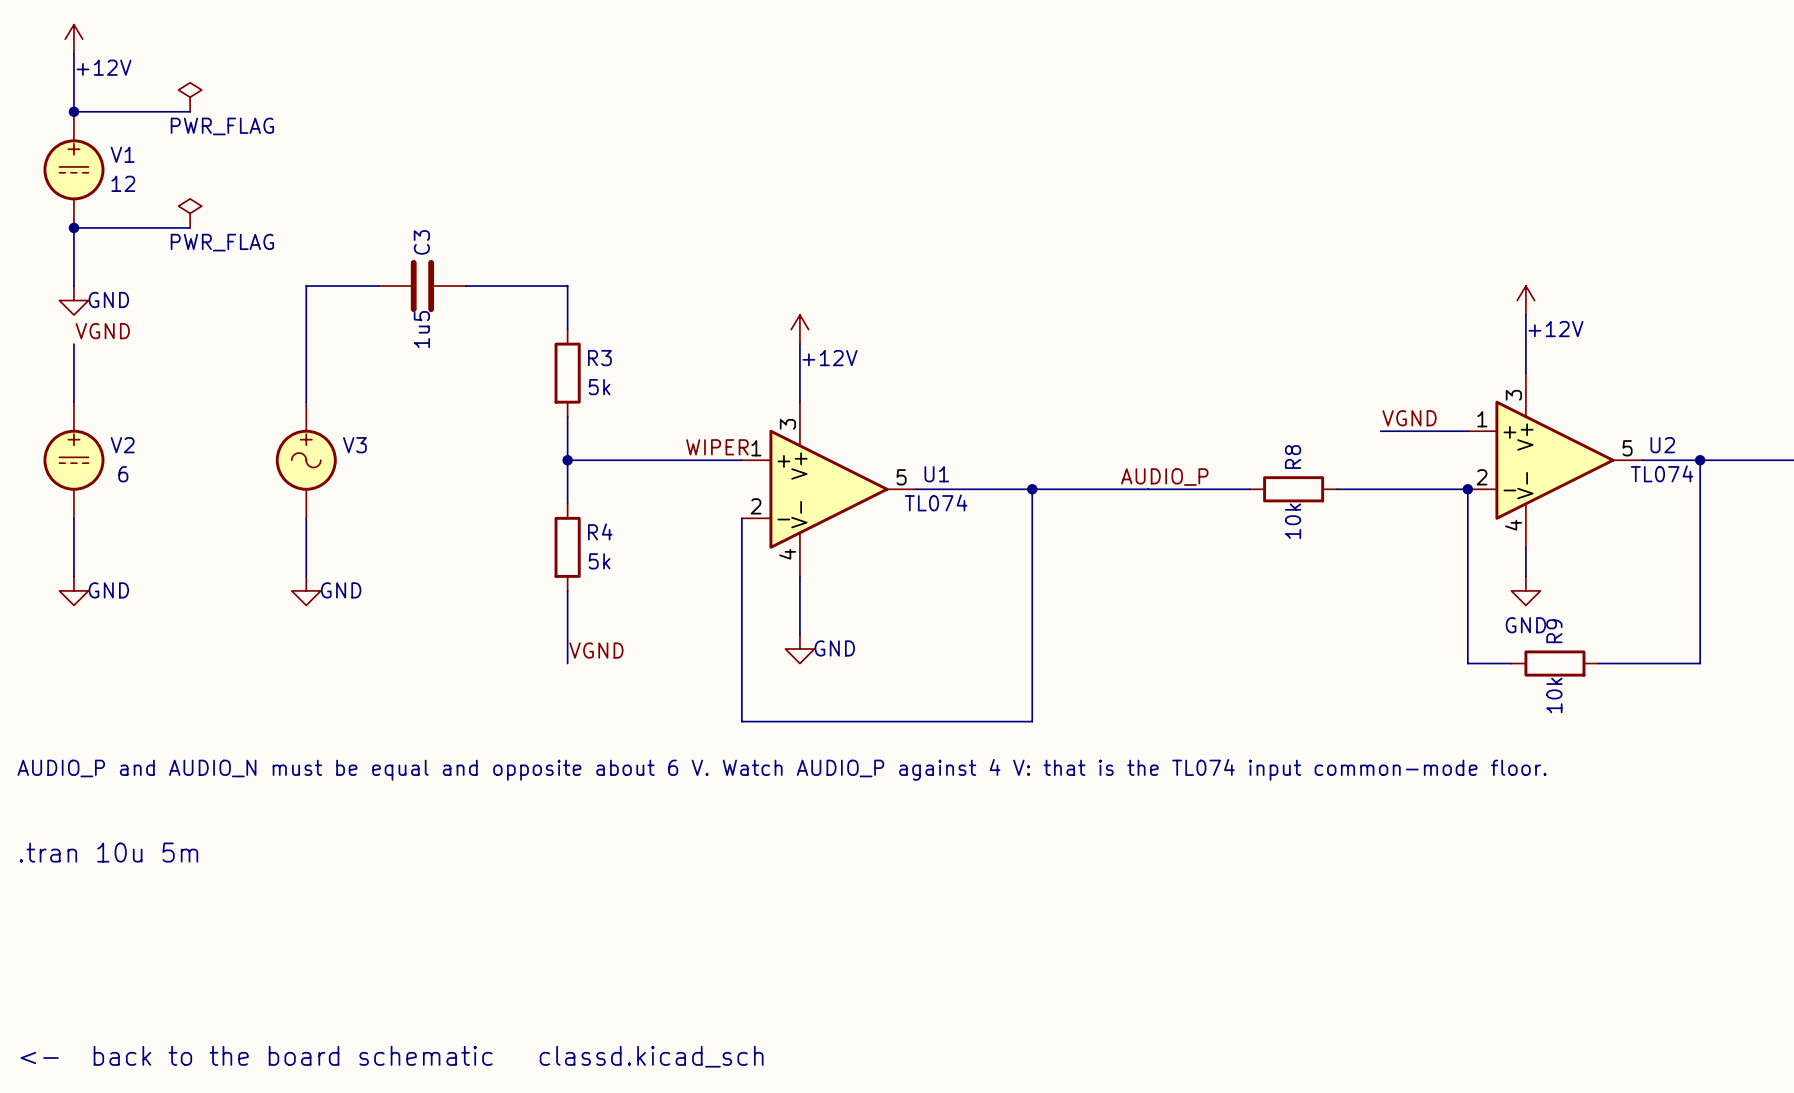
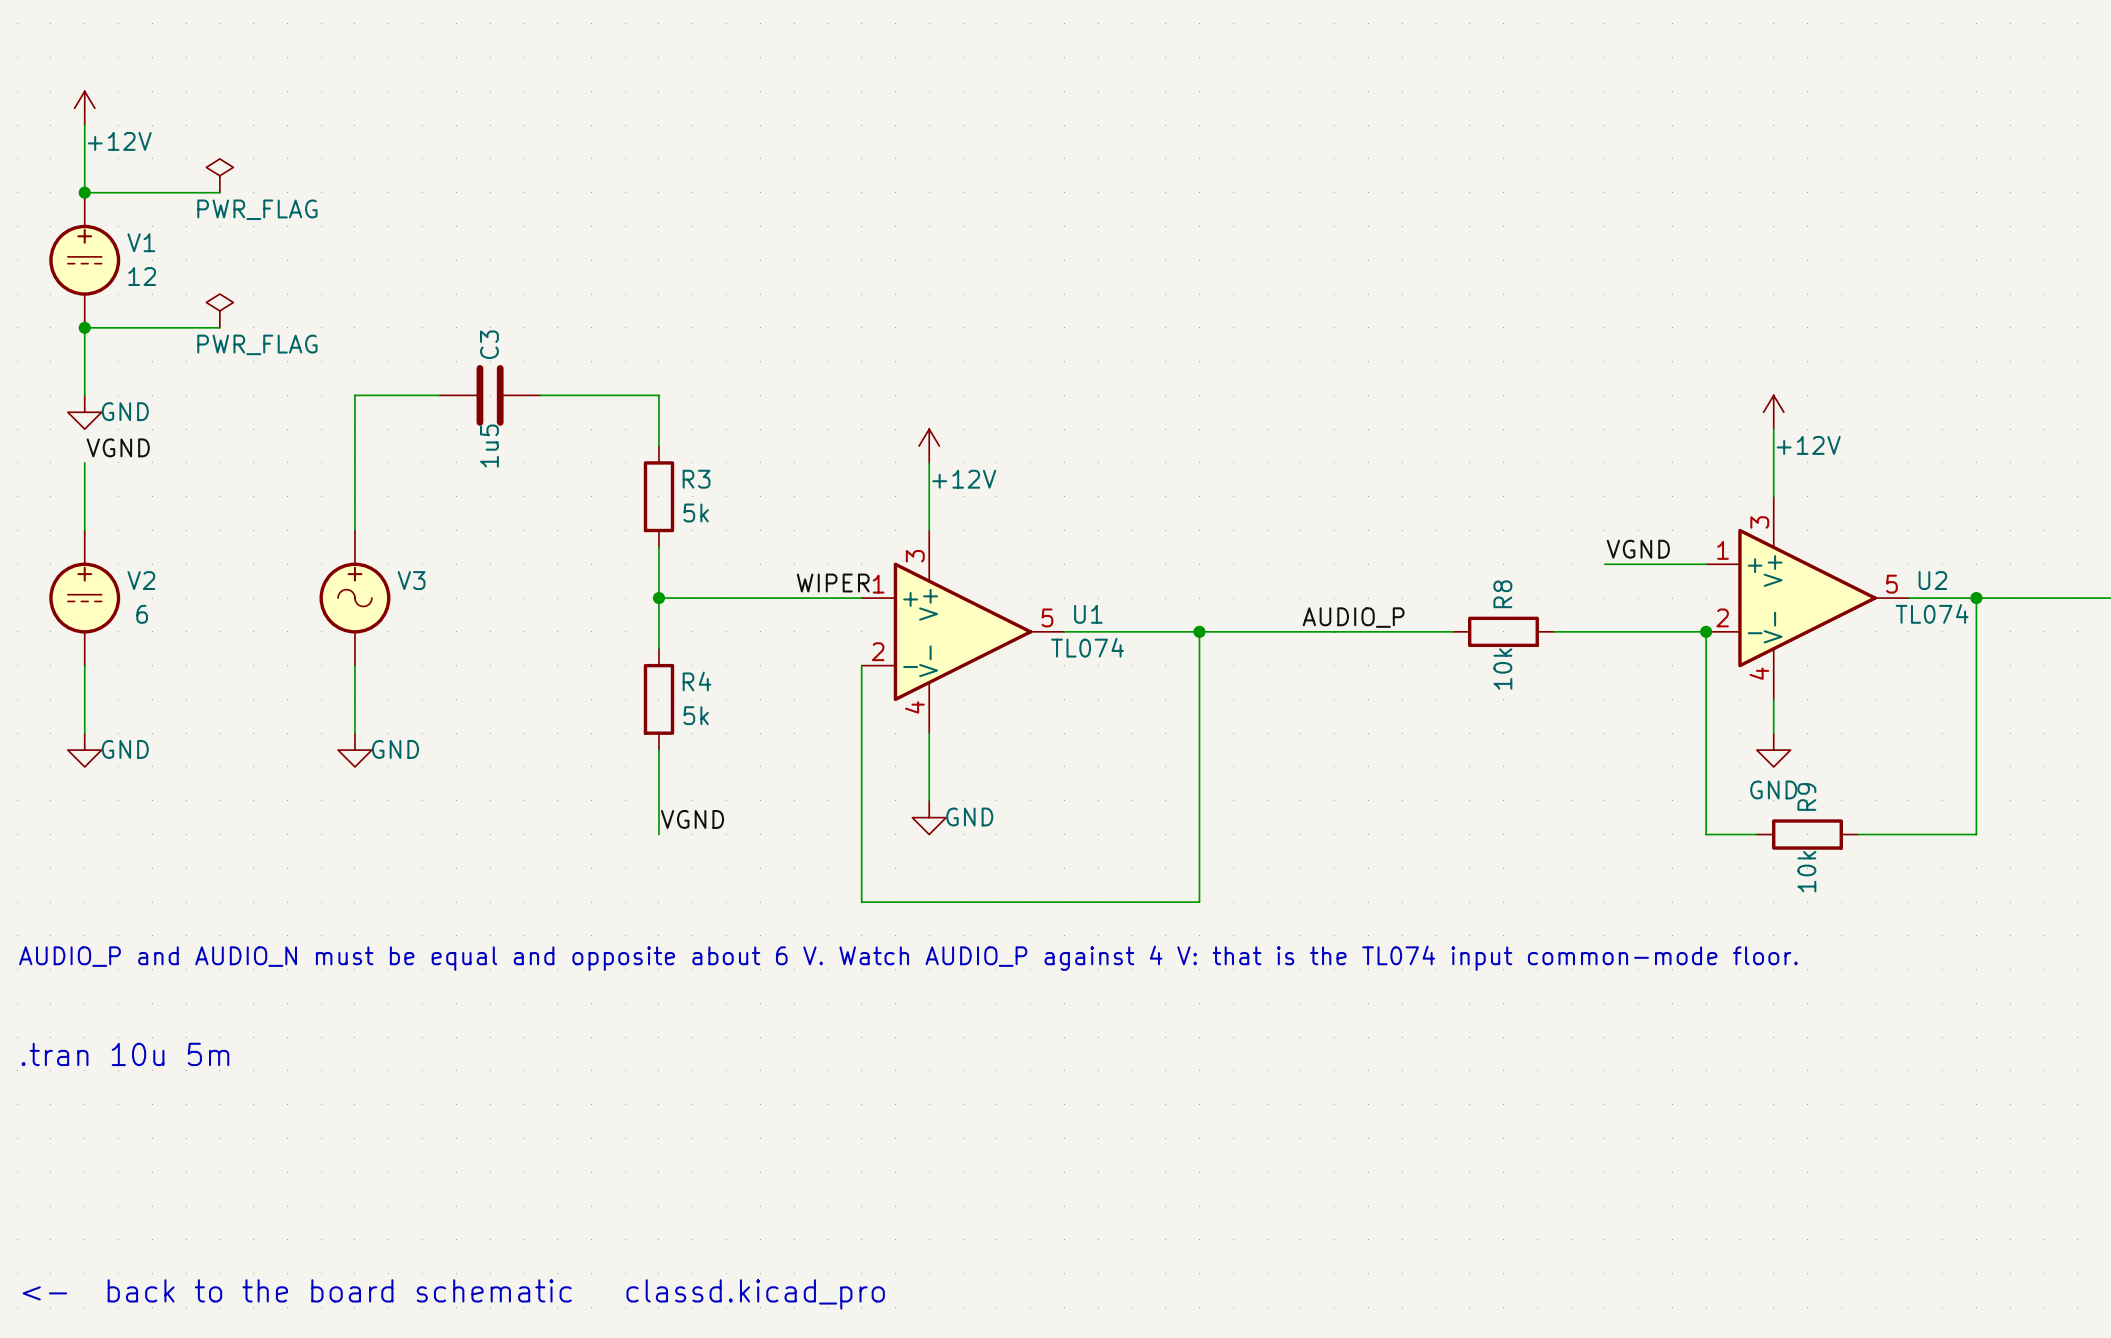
text: <- back to the board schematic classd.kicad_sch (392, 1056) -> <- back to the board schematic classd.kicad_pro (453, 1294)

